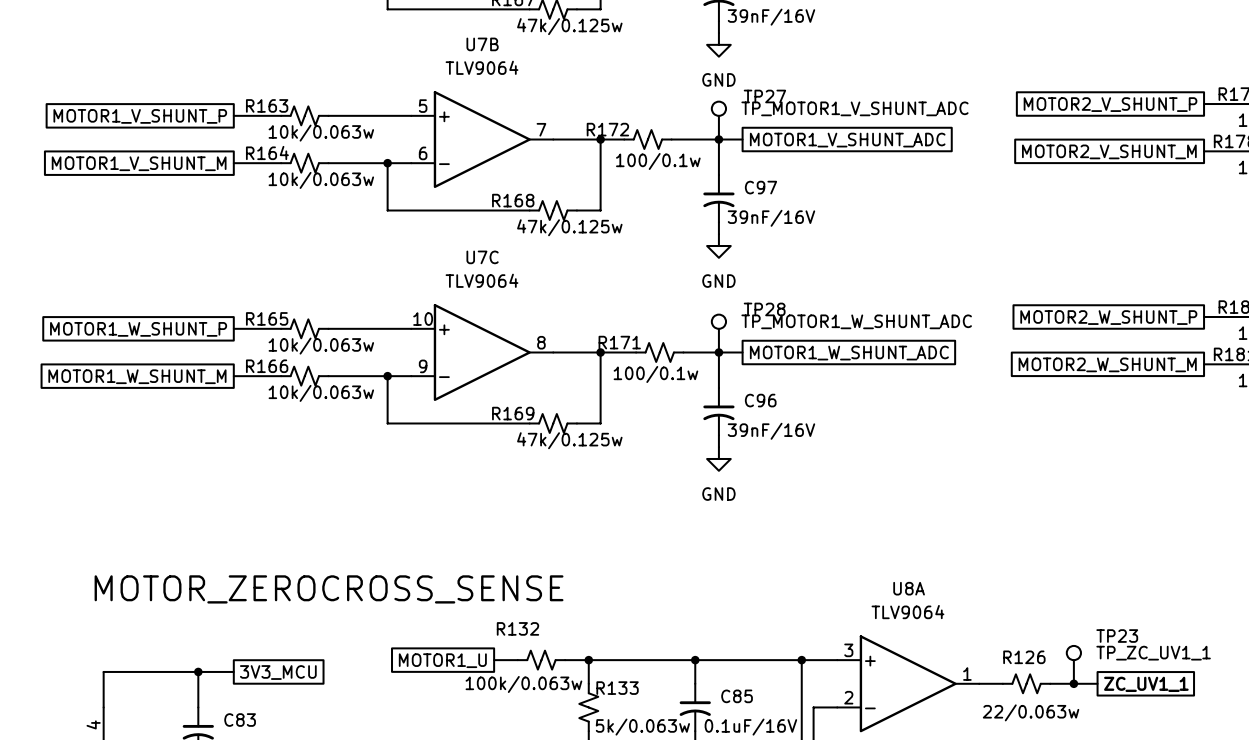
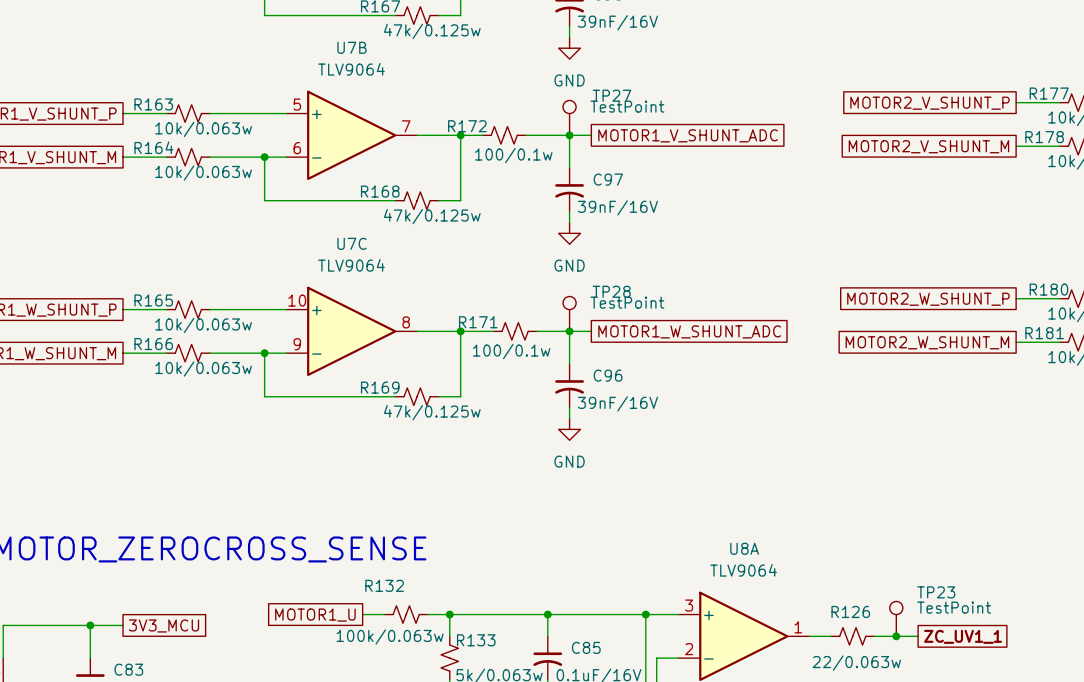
TP27 value: TP_MOTOR1_V_SHUNT_ADC (854, 108) -> TestPoint (627, 106)
TP28 value: TP_MOTOR1_W_SHUNT_ADC (856, 321) -> TestPoint (627, 302)
TP23 value: TP_ZC_UV1_1 (1153, 653) -> TestPoint (954, 607)

